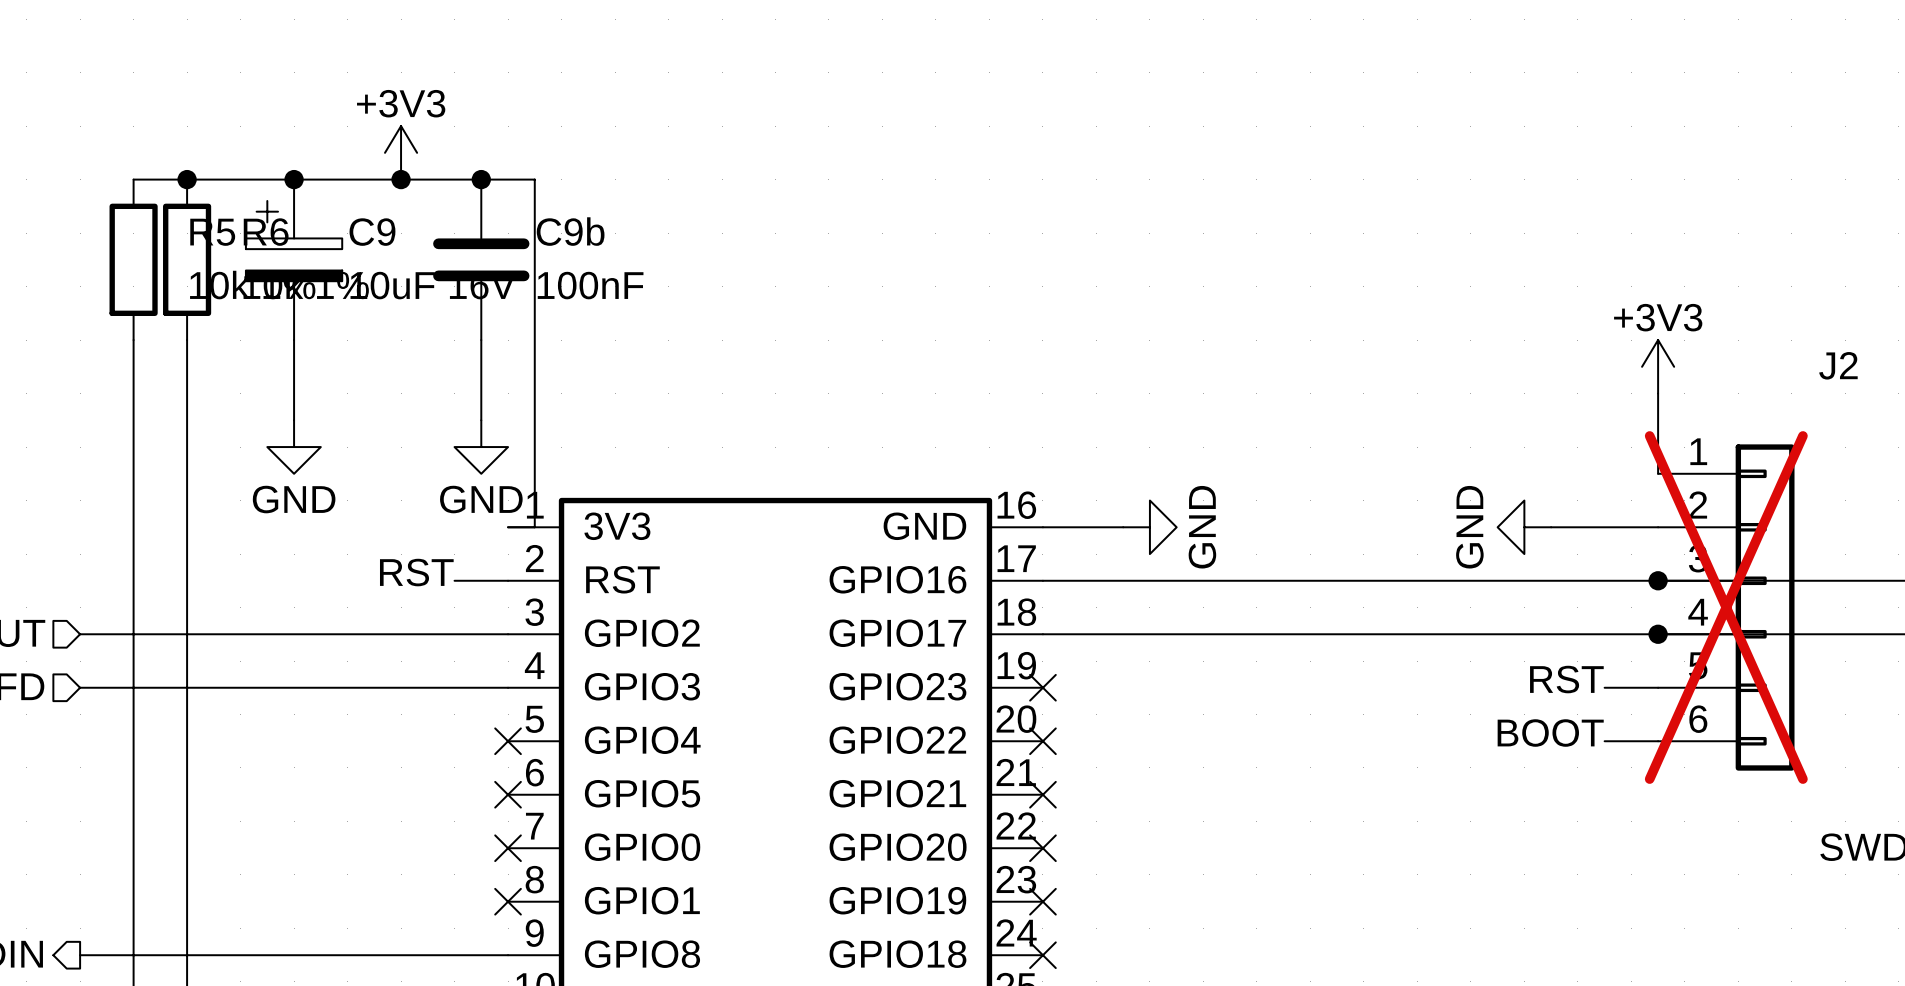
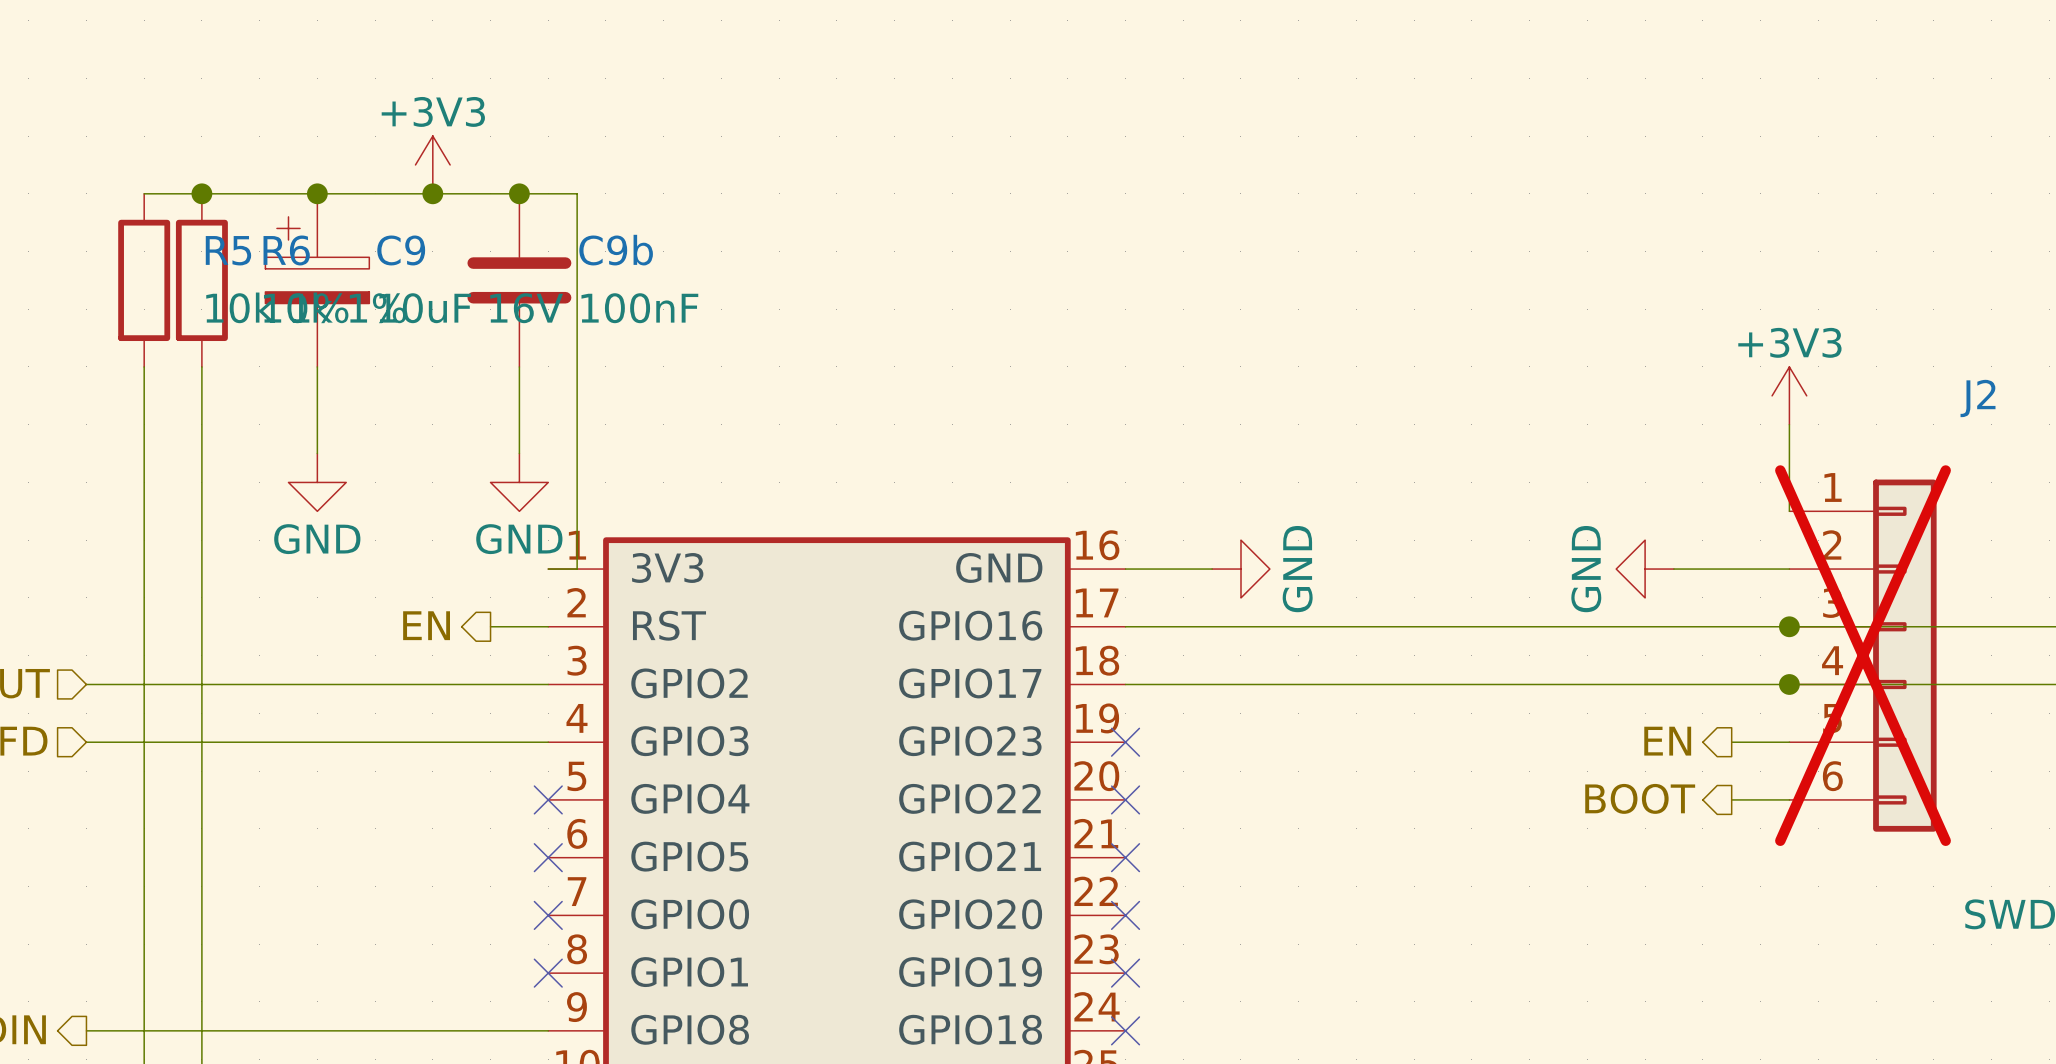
label: RST (416, 572) -> none
hierarchical label: none -> EN (426, 625)
label: RST (1566, 679) -> none
hierarchical label: none -> EN (1667, 741)
label: BOOT (1550, 733) -> none
hierarchical label: none -> BOOT (1640, 798)

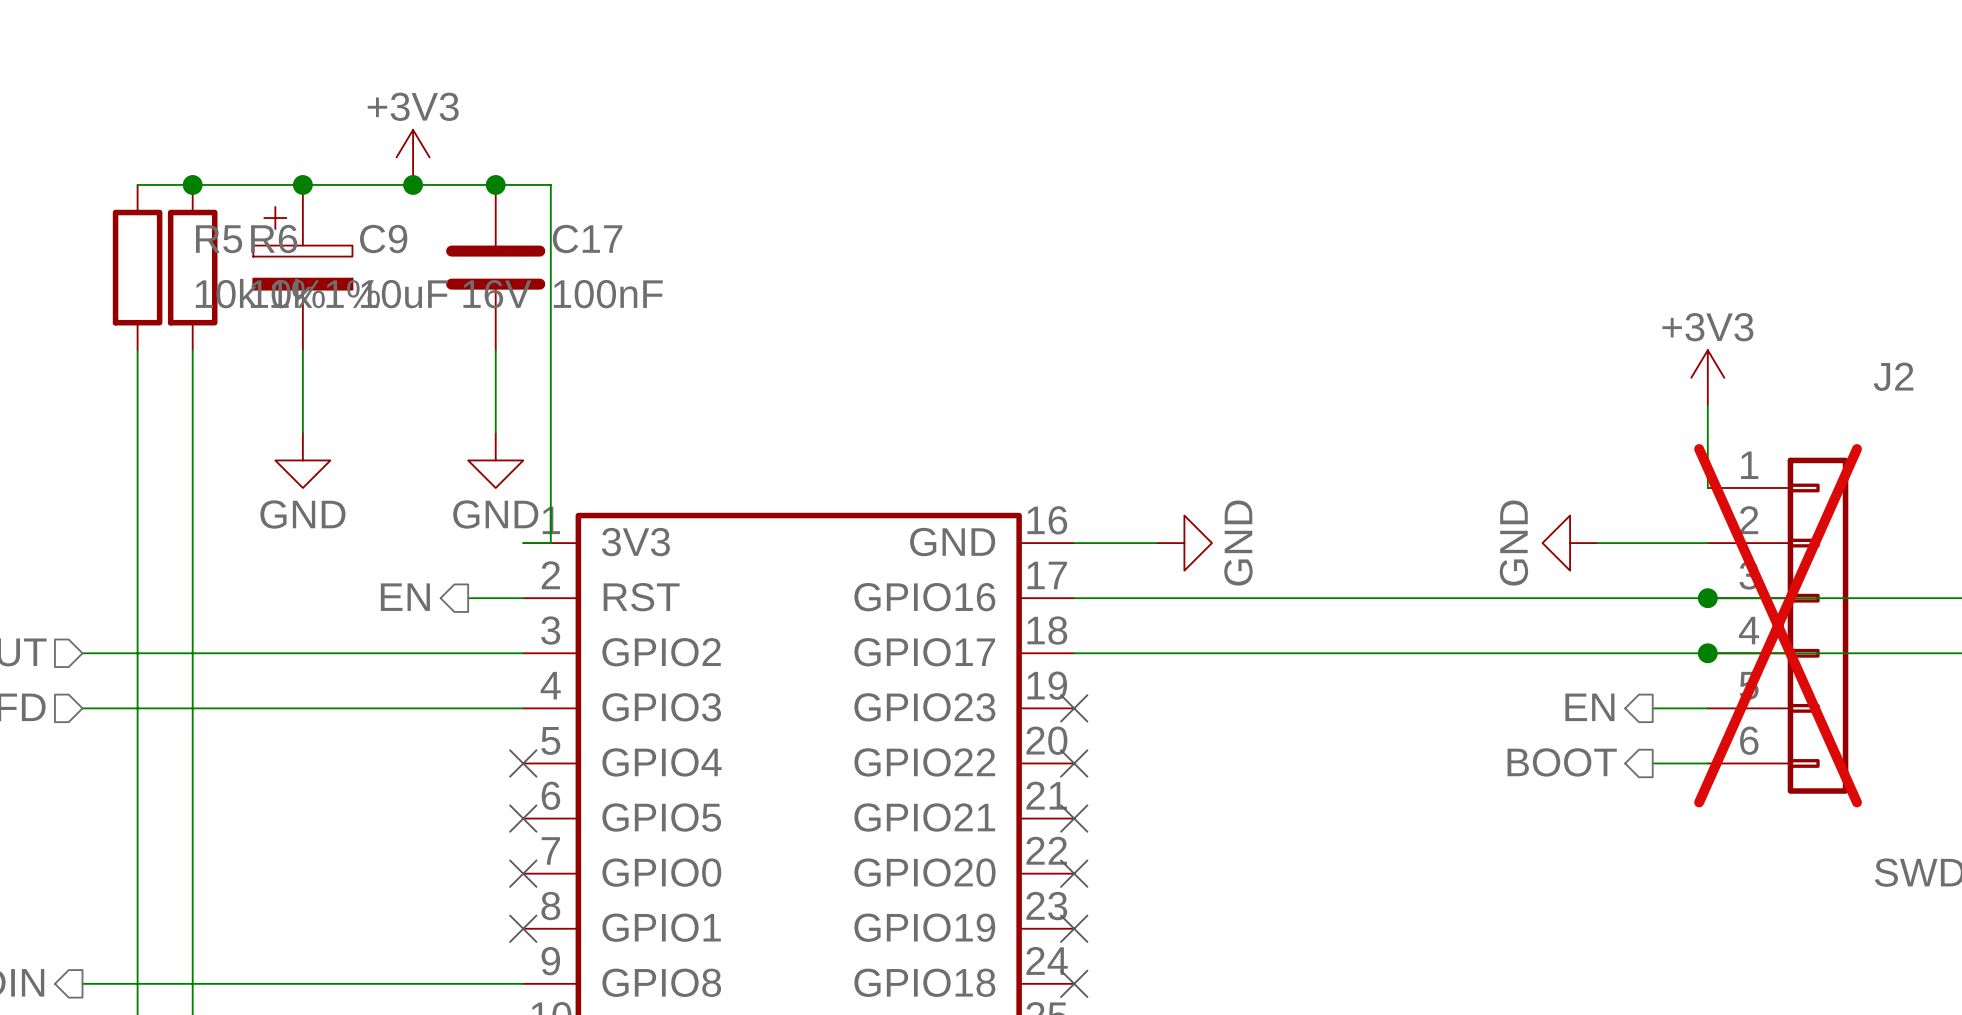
C9b name: C9b (616, 250) -> C17 (587, 239)

